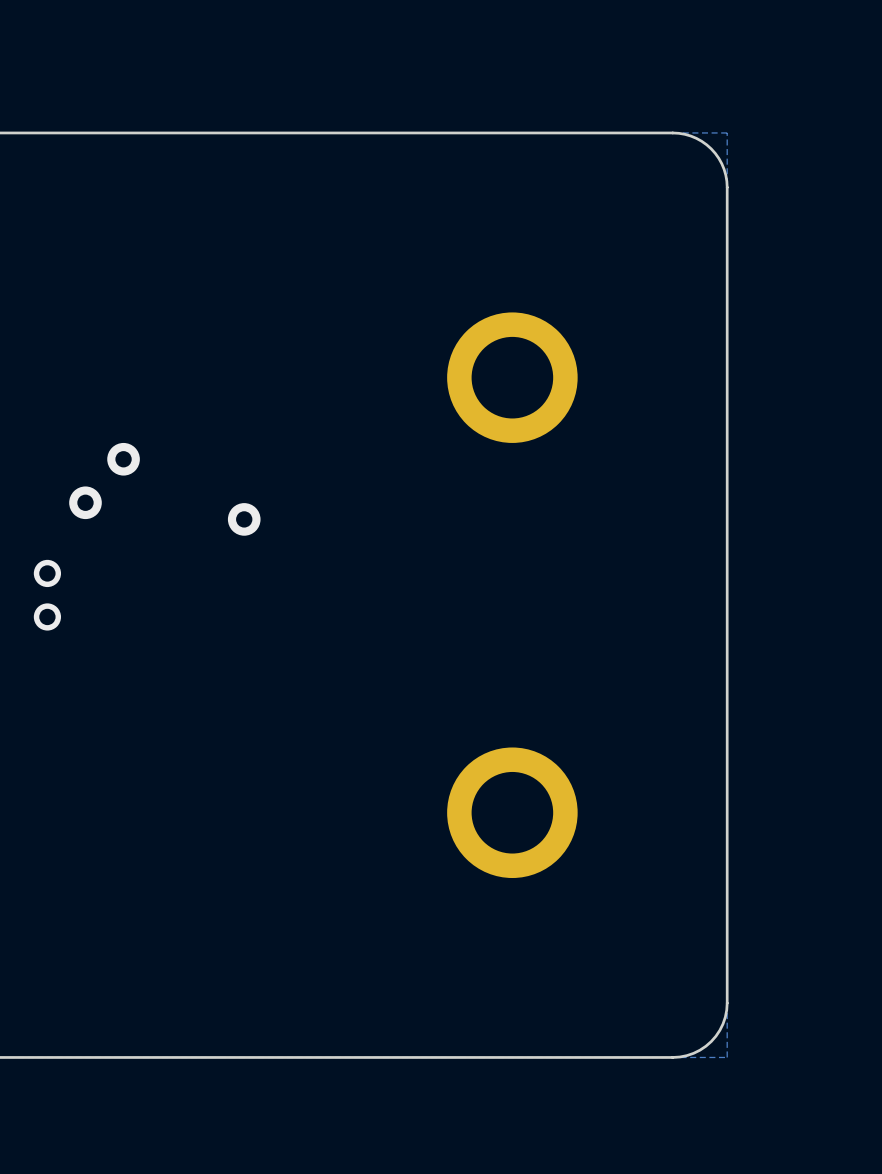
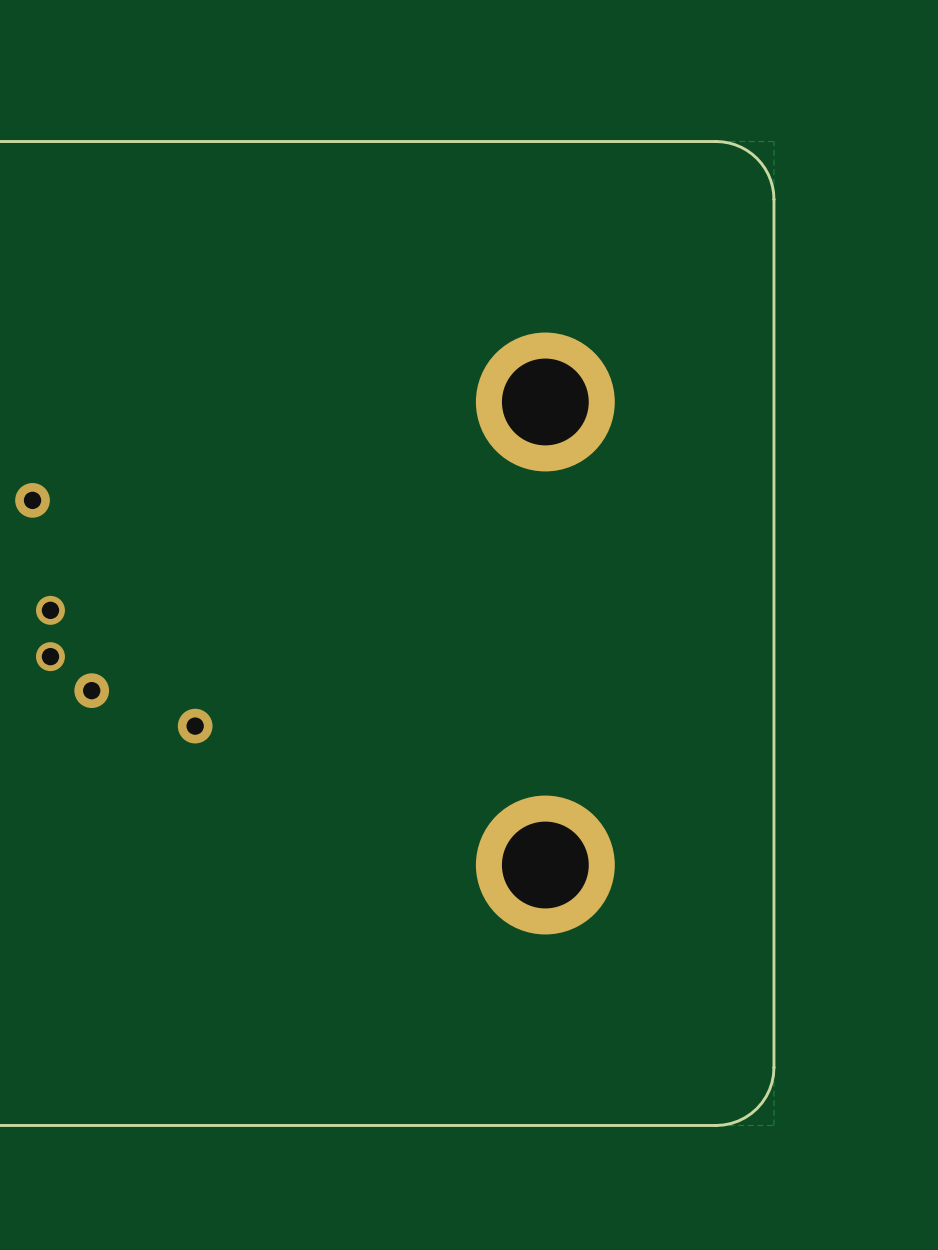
via: (123, 459) -> none
via: none -> (32, 500)
via: (85, 502) -> none
via: (244, 519) -> none
via: none -> (91, 690)
via: none -> (195, 726)

